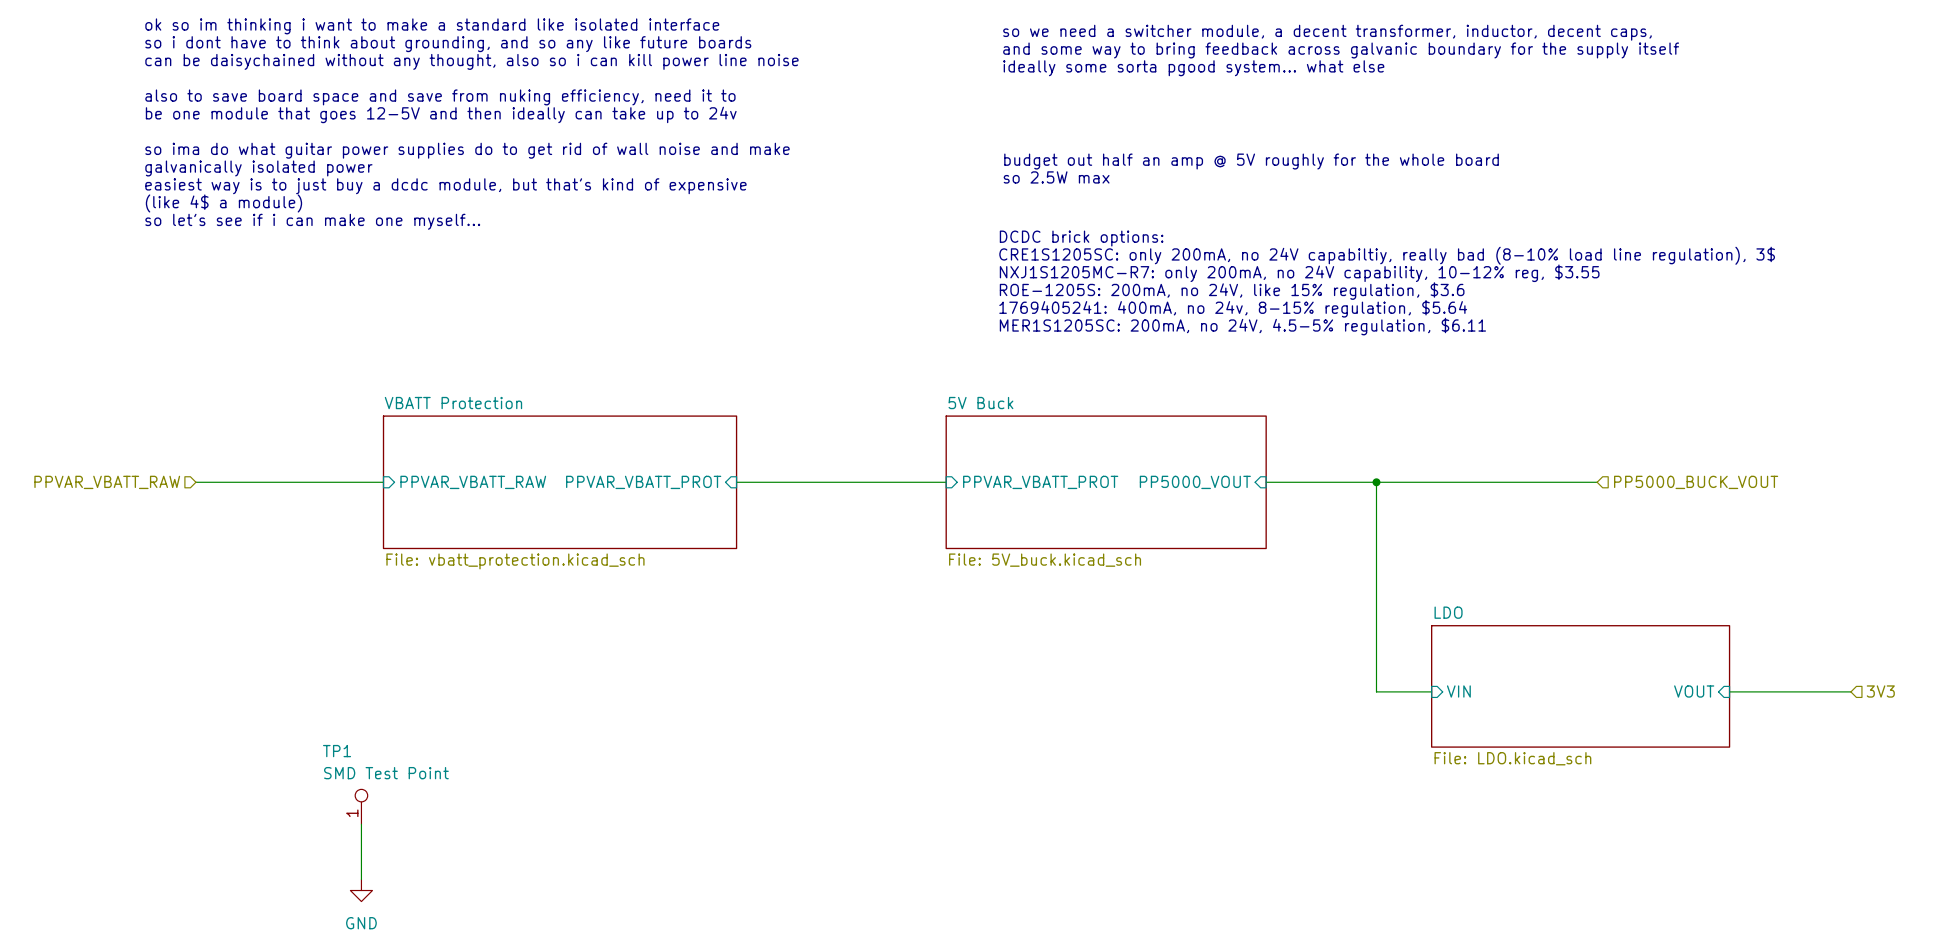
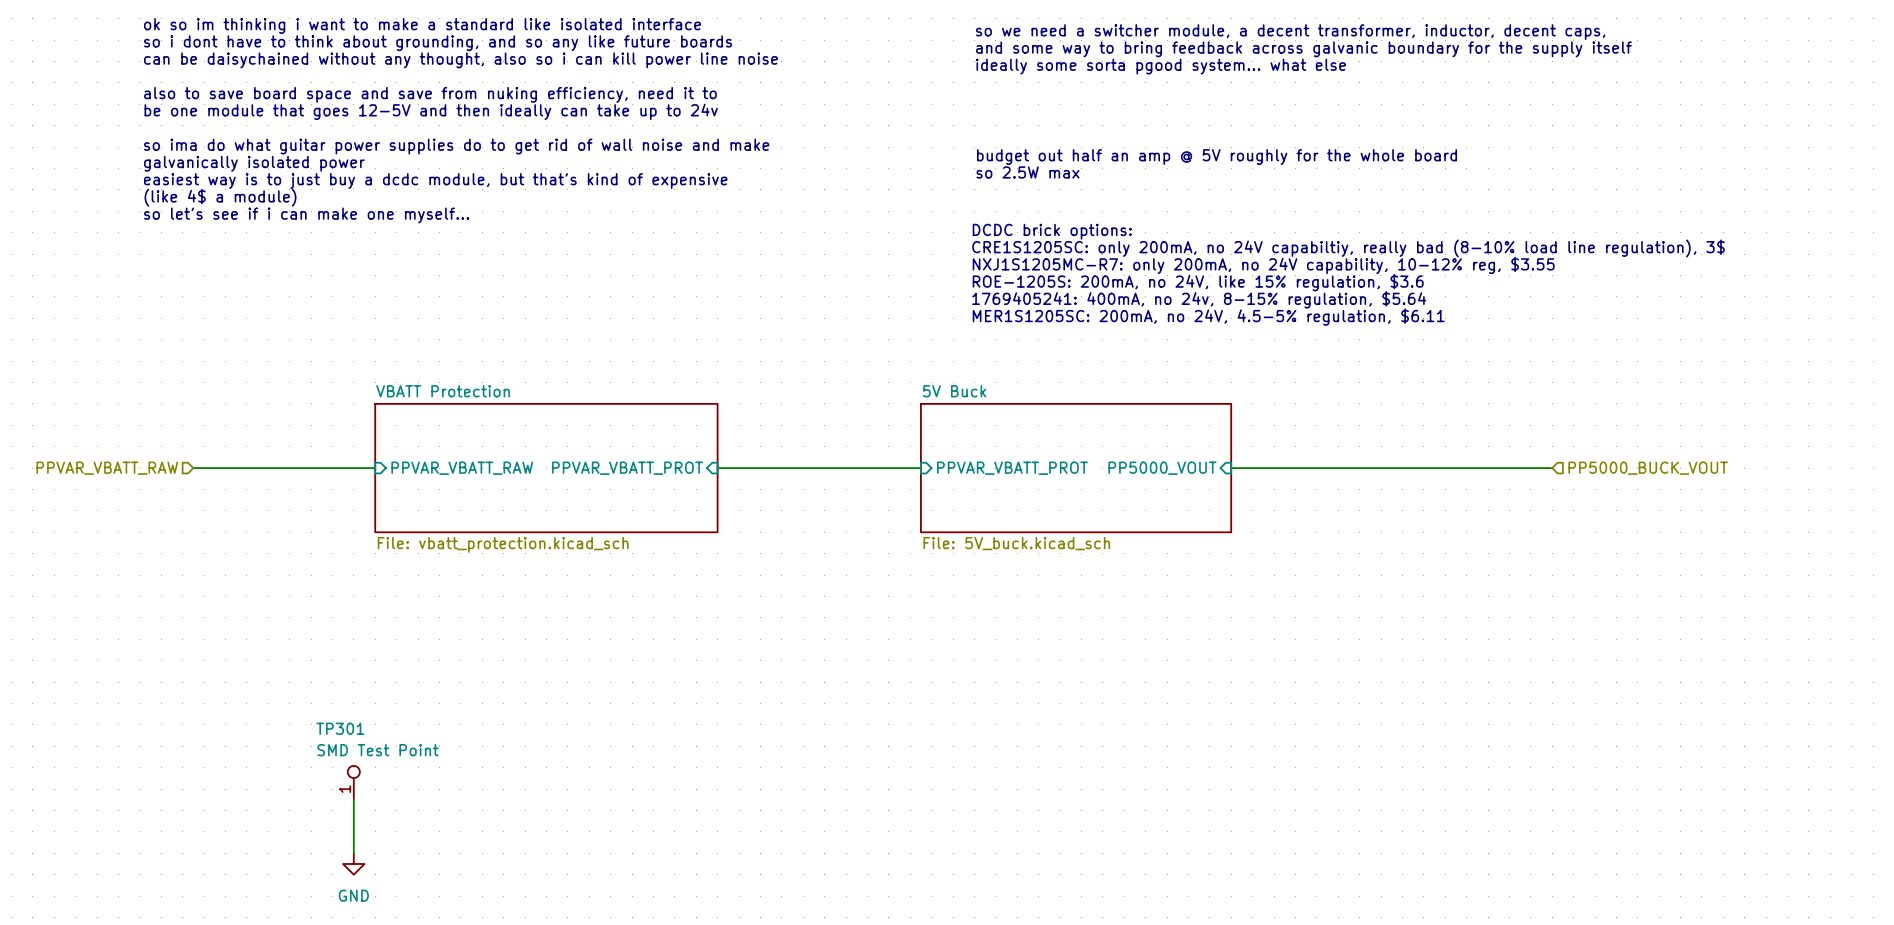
wire: (1376, 482) (1376, 691) (1431, 691) -> none
junction: (1376, 482) -> none
sheet LDO: File: LDO.kicad_sch (1580, 686) -> none
sheet pin: VIN (1458, 691) -> none
sheet pin: VOUT (1694, 691) -> none
wire: (1729, 691) (1850, 691) -> none
hierarchical label: 3V3 (1880, 691) -> none
TP1 name: TP1 (337, 751) -> TP301 (340, 728)

